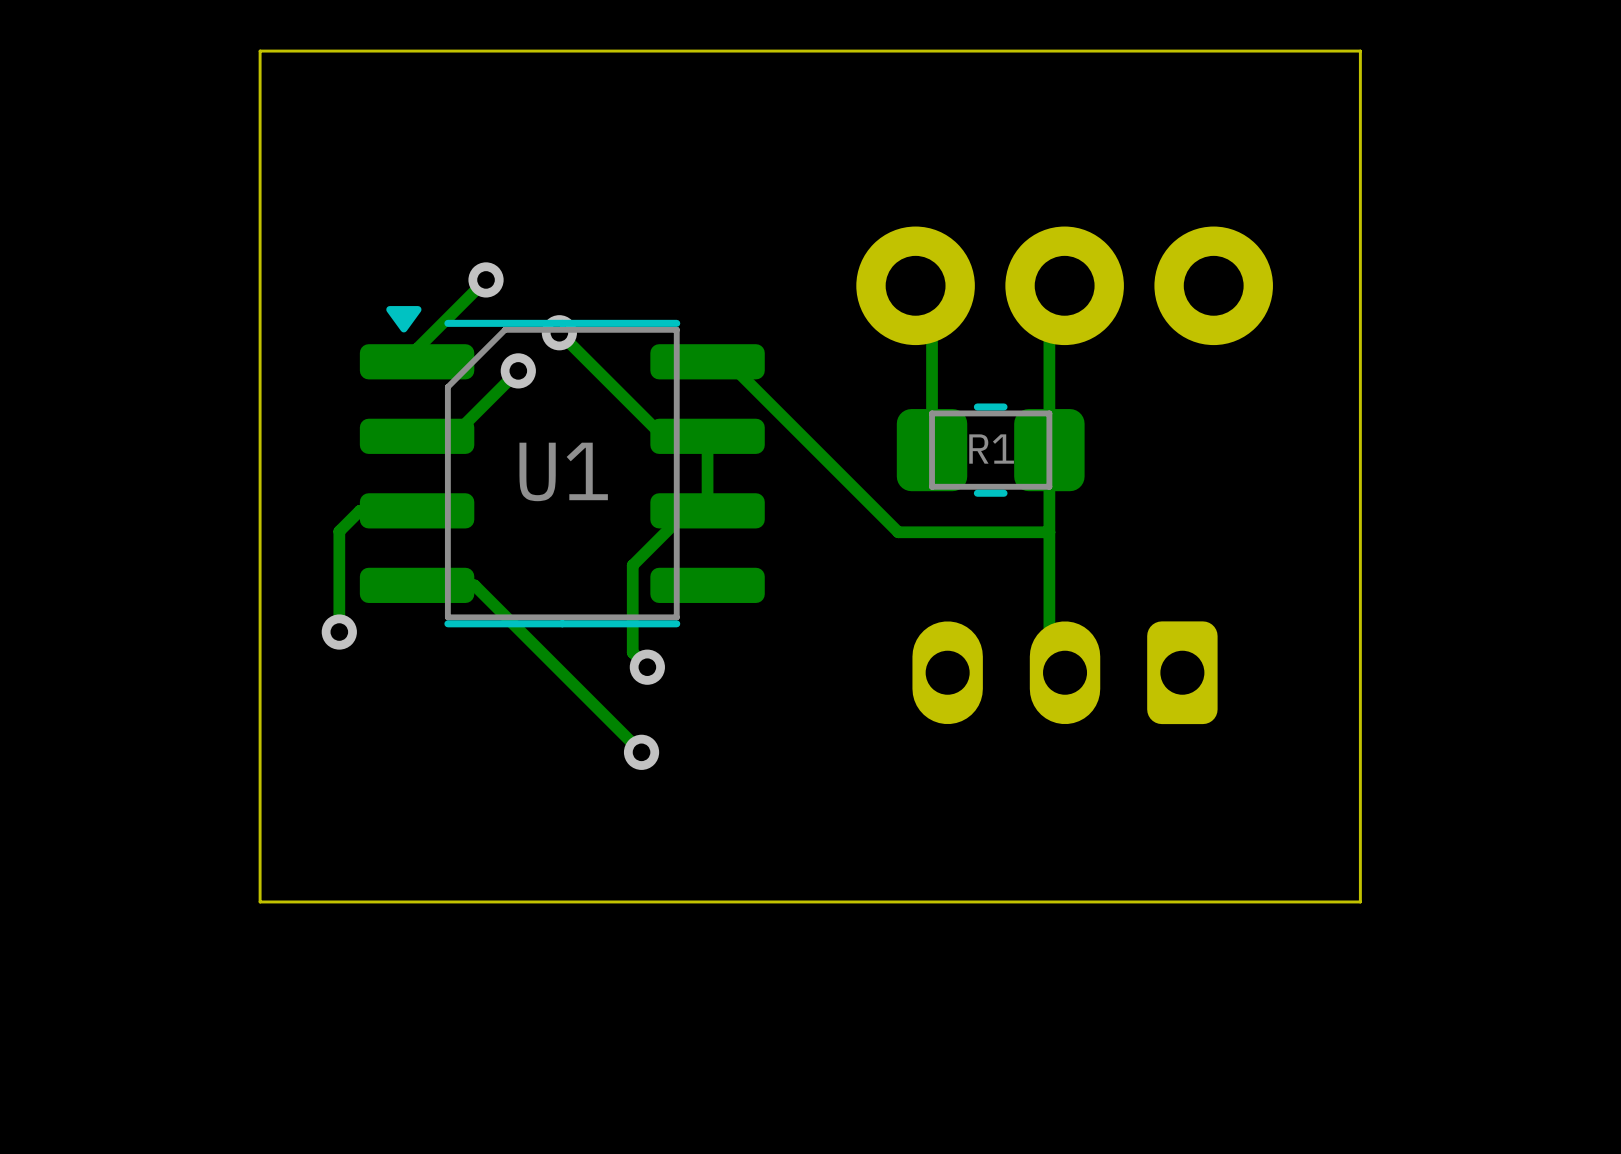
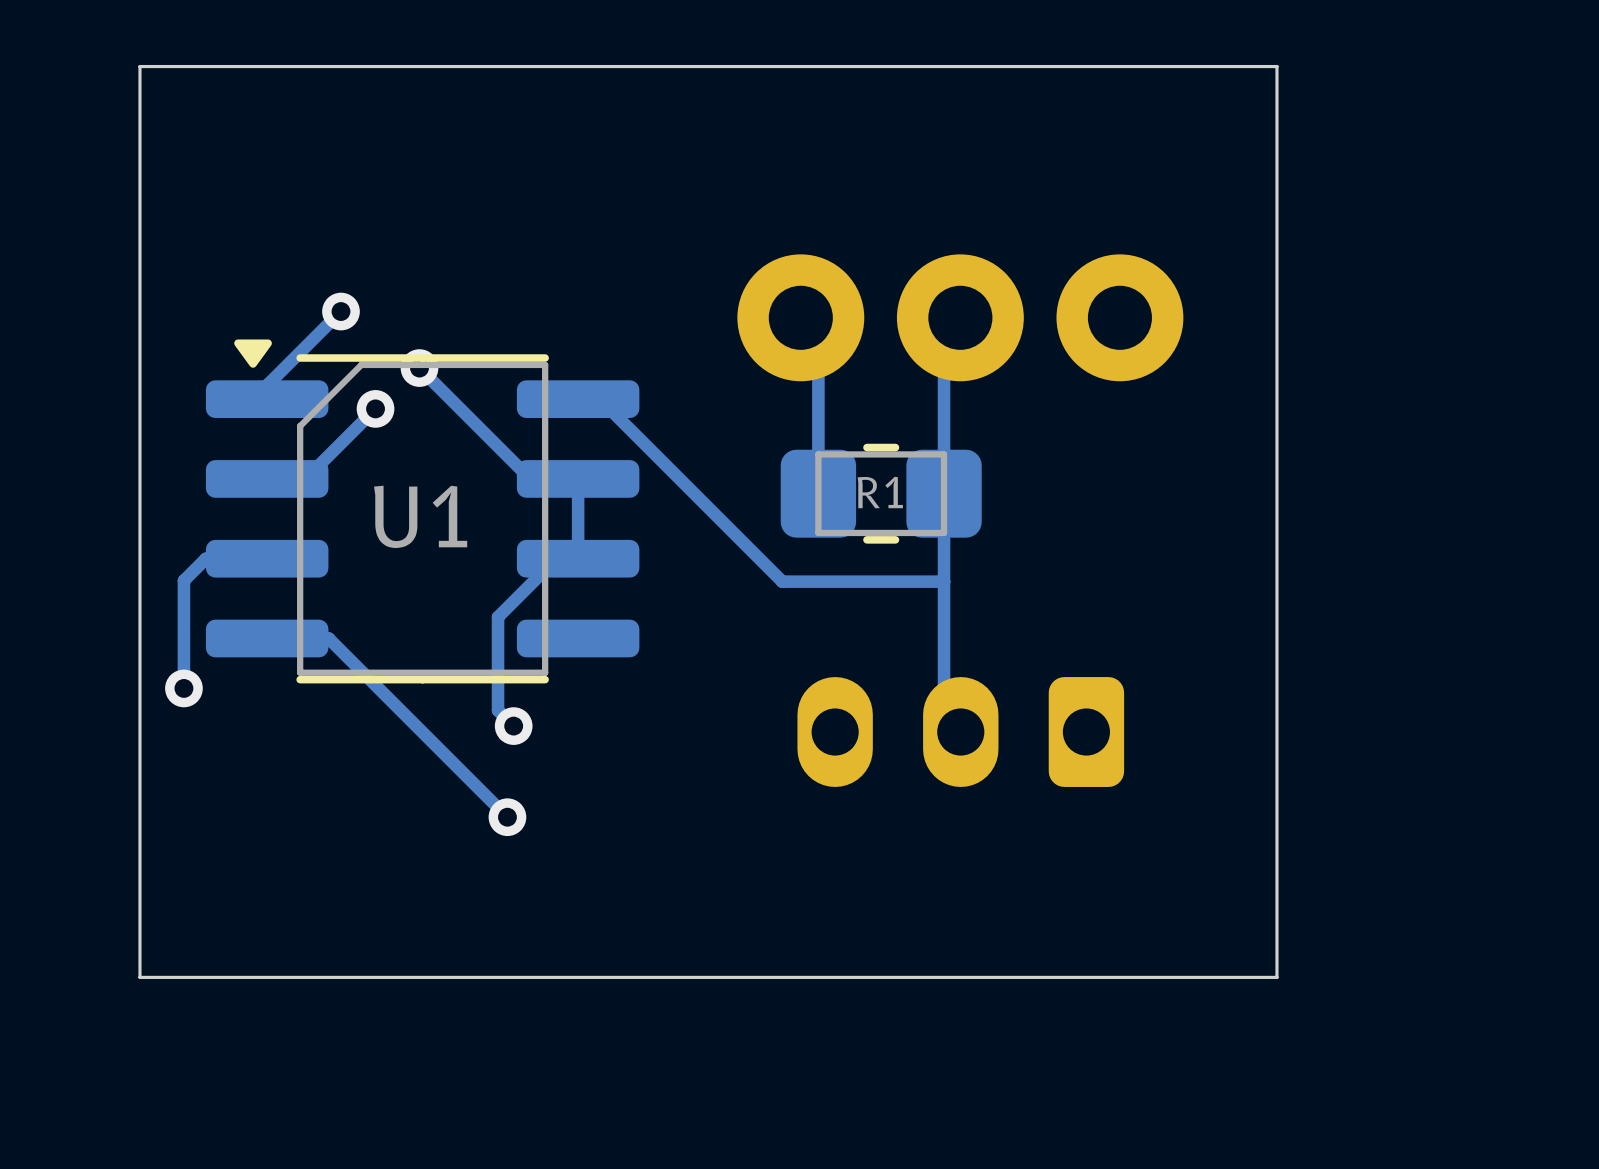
board edge: (298, 51) (260, 51) (260, 901) (298, 901) -> (139, 66) (139, 977)

